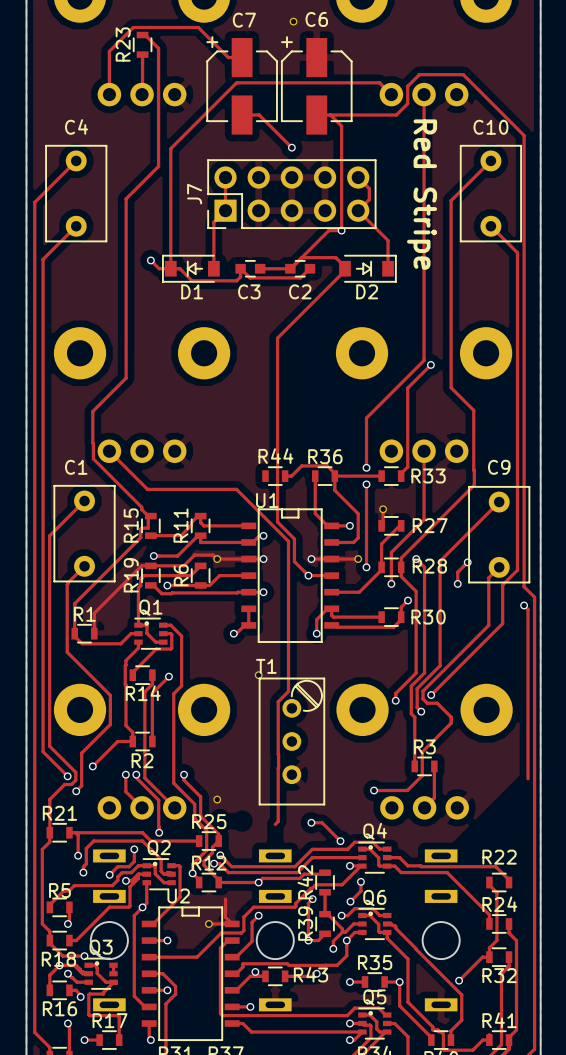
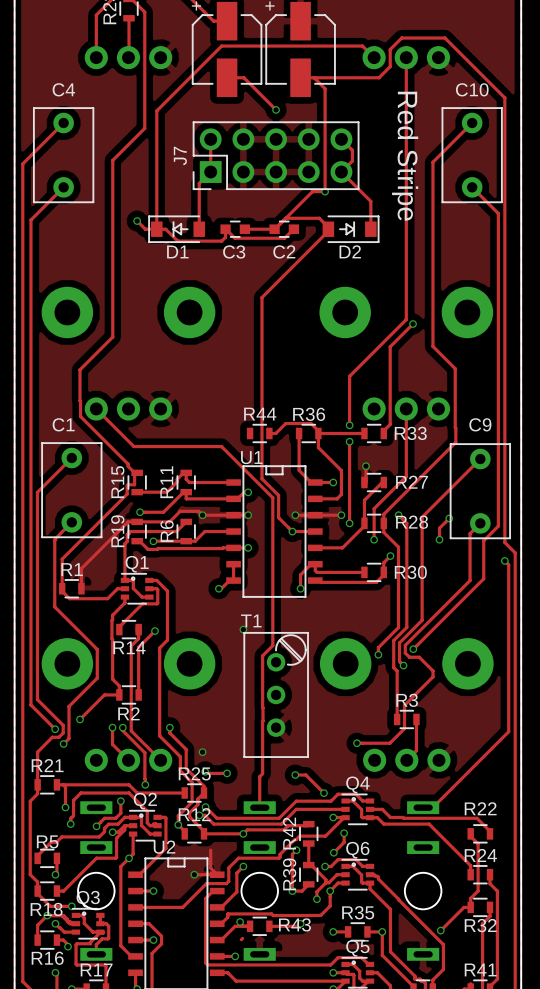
track: none -> (508, 731) (432, 807)
track: none -> (205, 771) (206, 773) (227, 773)
via: none -> (205, 771)
via: none -> (227, 773)
track: none -> (259, 776) (259, 807)
track: none -> (100, 923) (106, 923) (108, 926) (108, 938) (102, 938) (96, 944) (96, 954)
track: none -> (242, 938) (241, 939)

